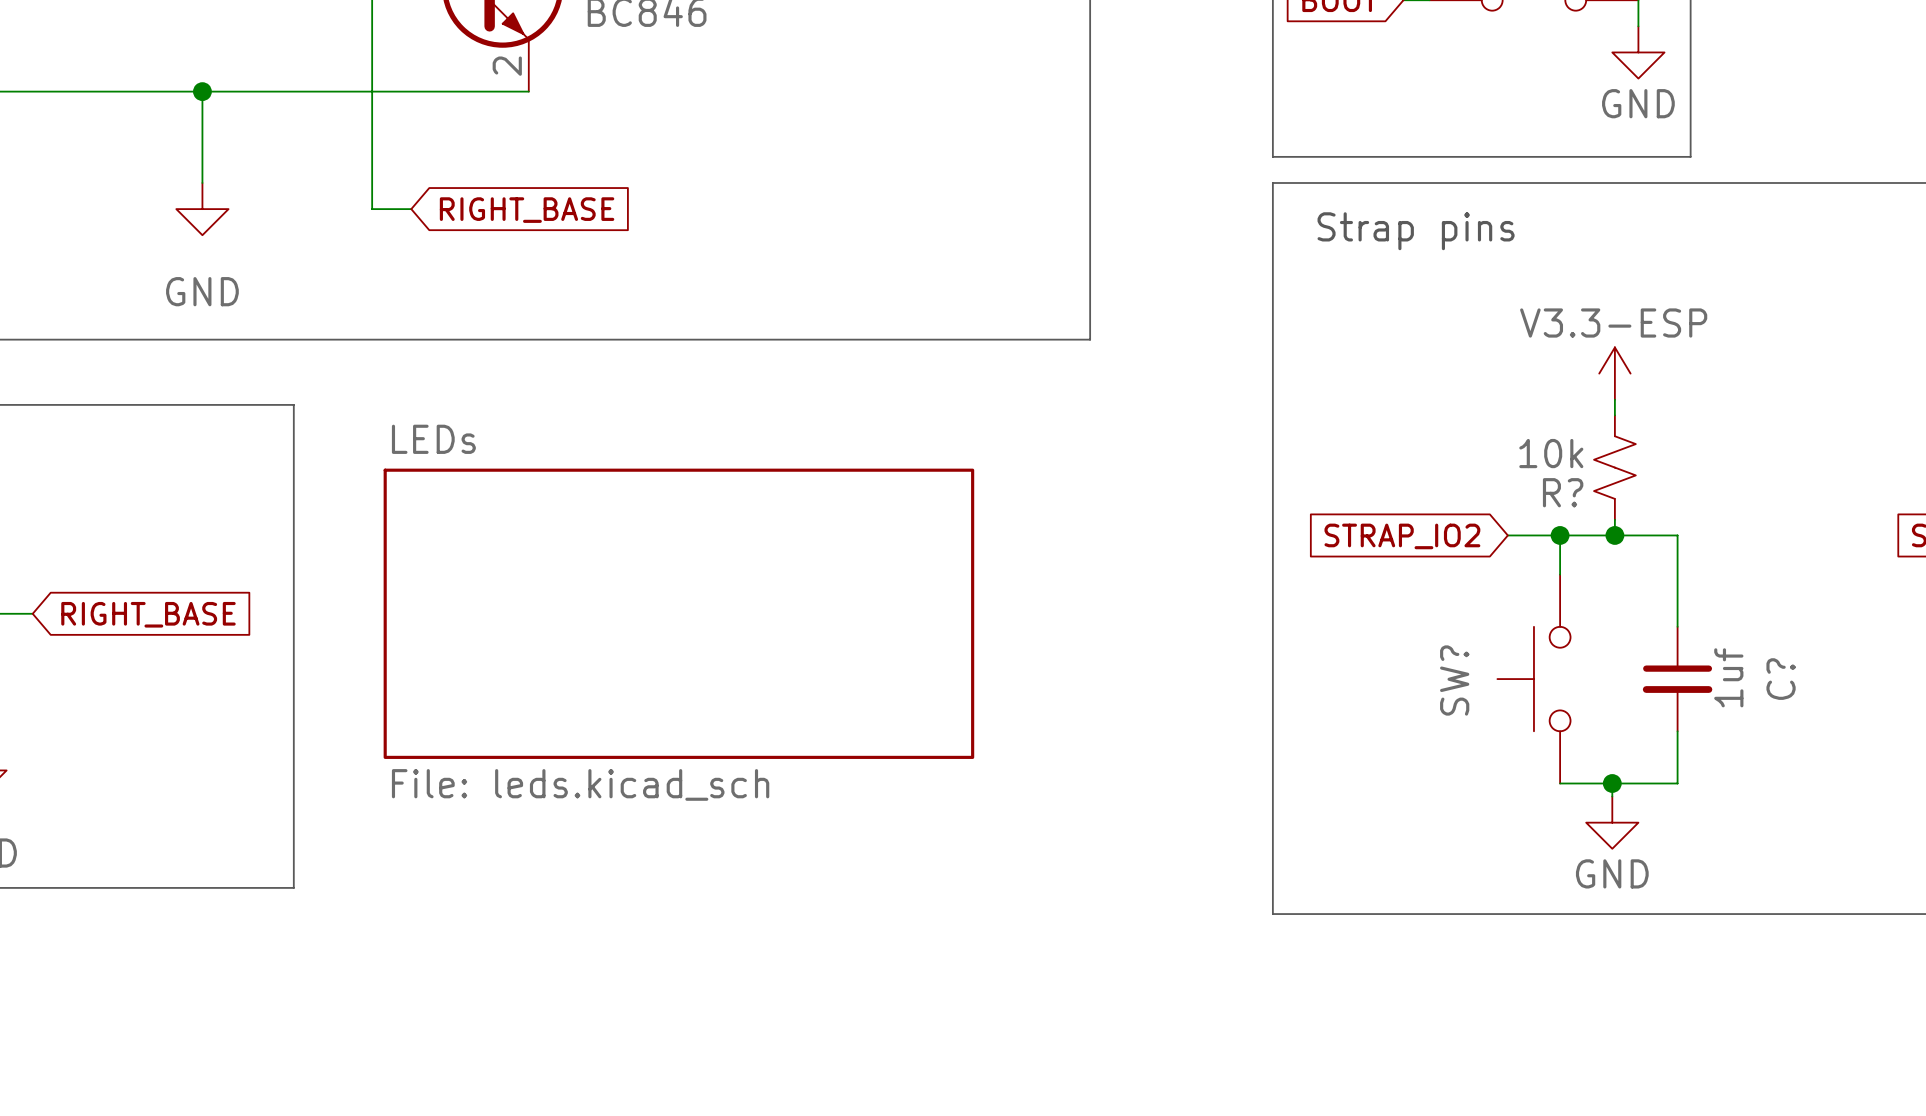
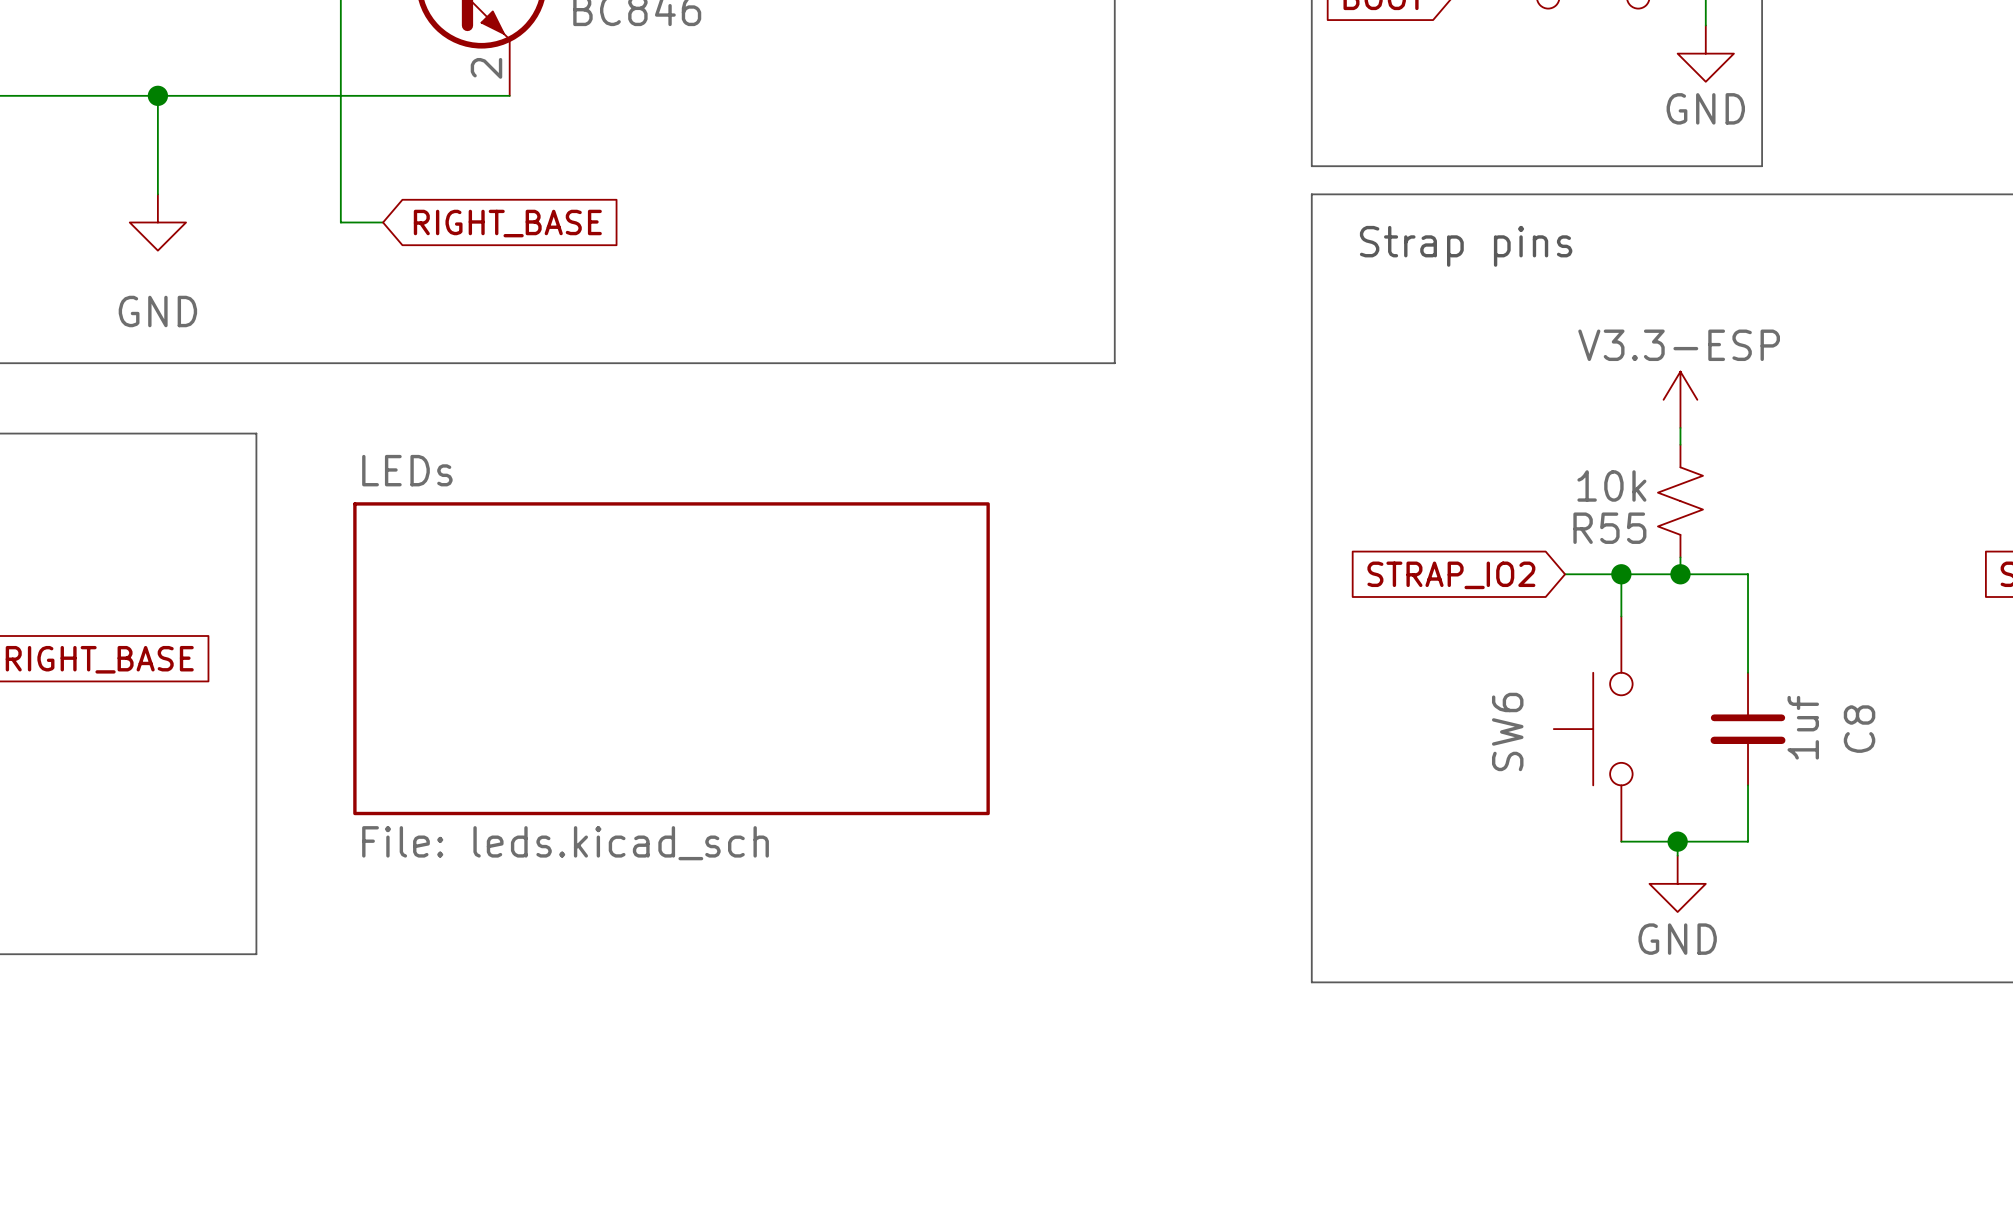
R? name: R? (1563, 492) -> R55 (1609, 528)
C? name: C? (1781, 679) -> C8 (1859, 729)
SW? name: SW? (1454, 680) -> SW6 (1507, 731)

